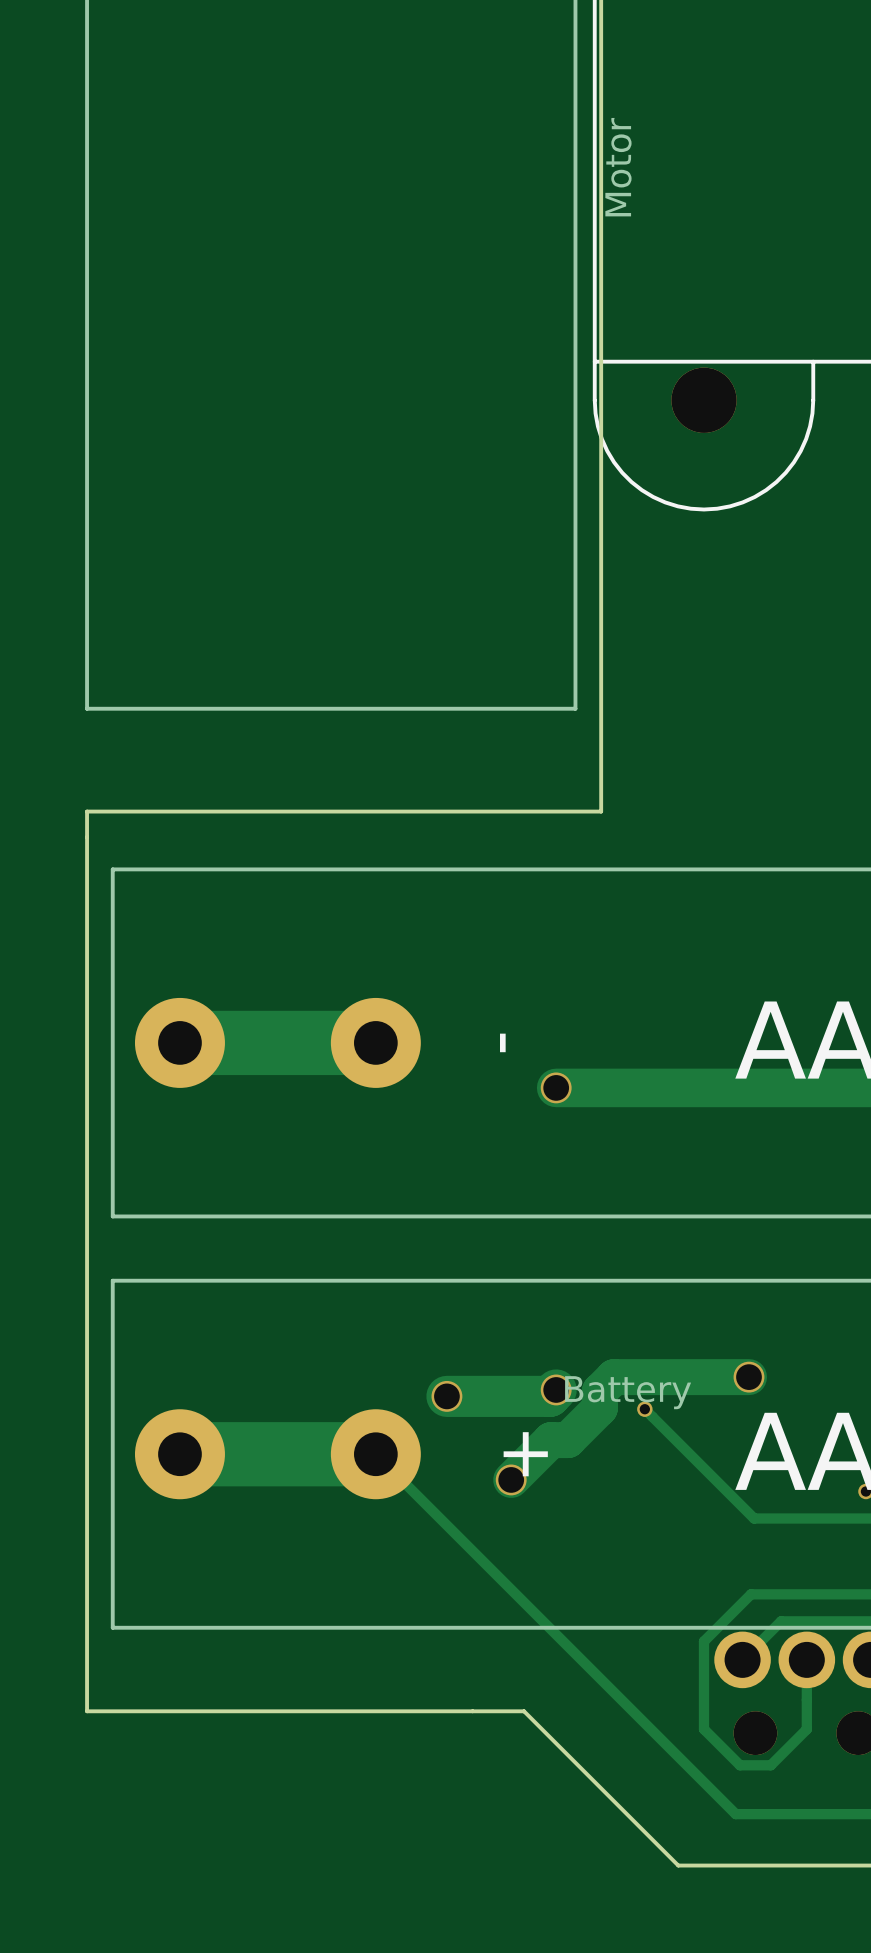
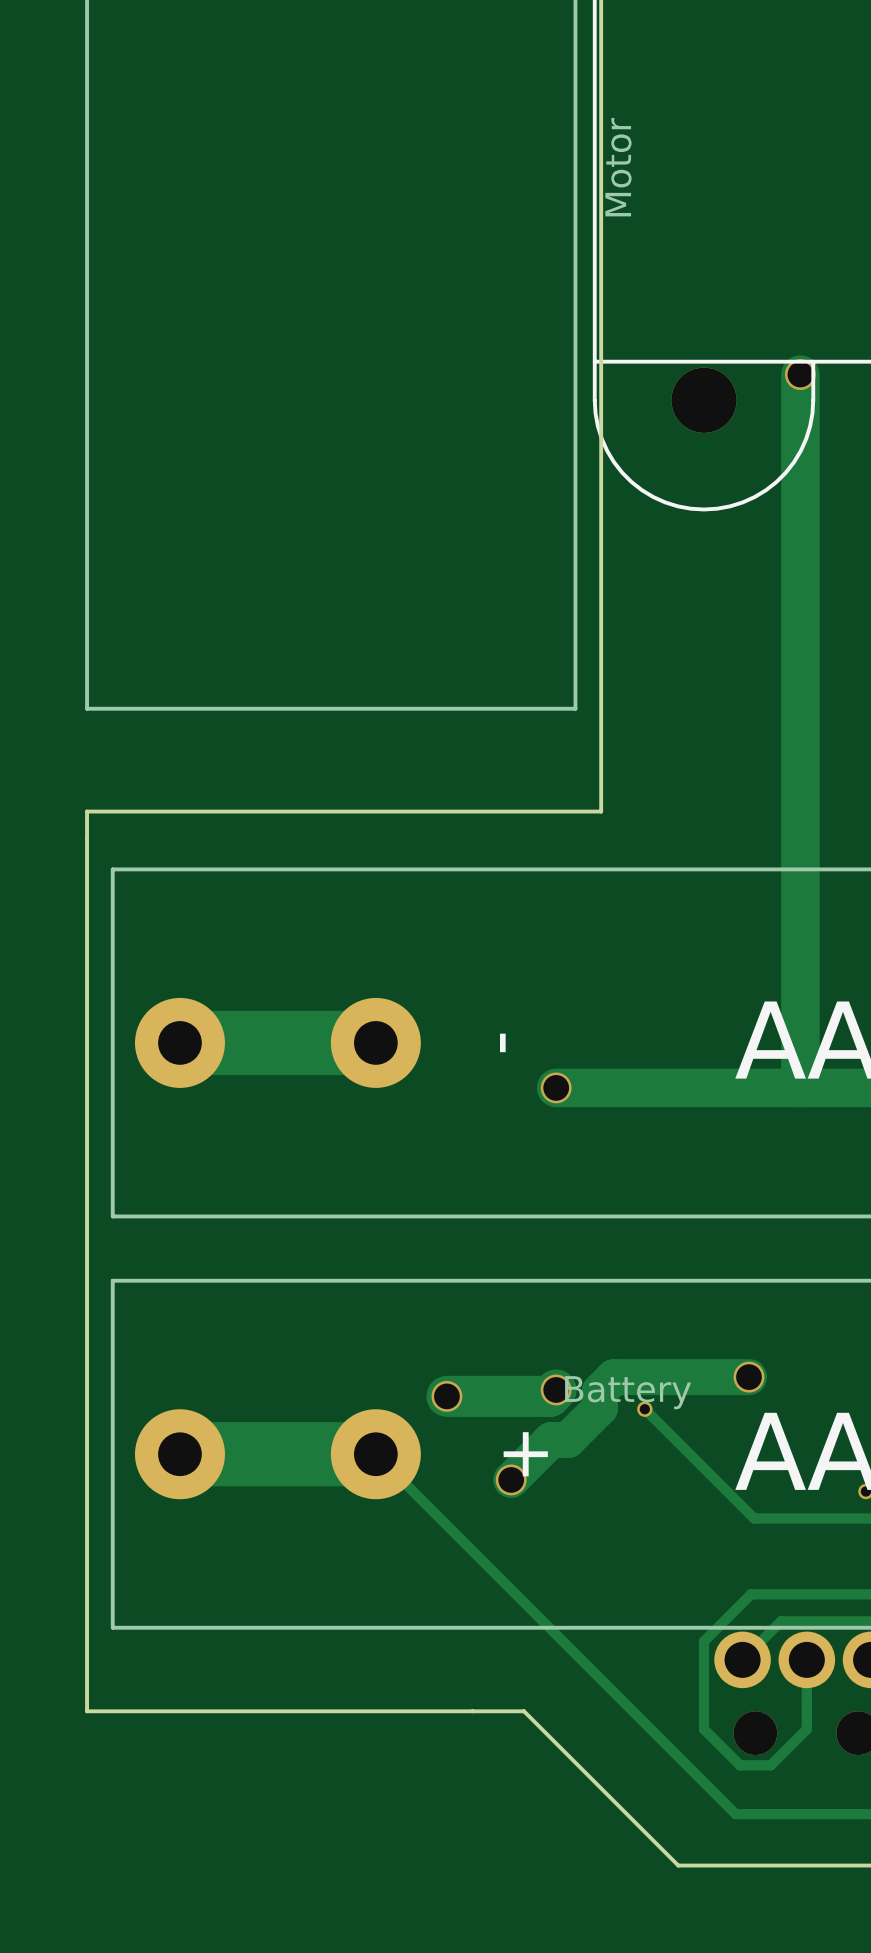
track: none -> (800, 374) (800, 1087)
via: none -> (800, 374)

